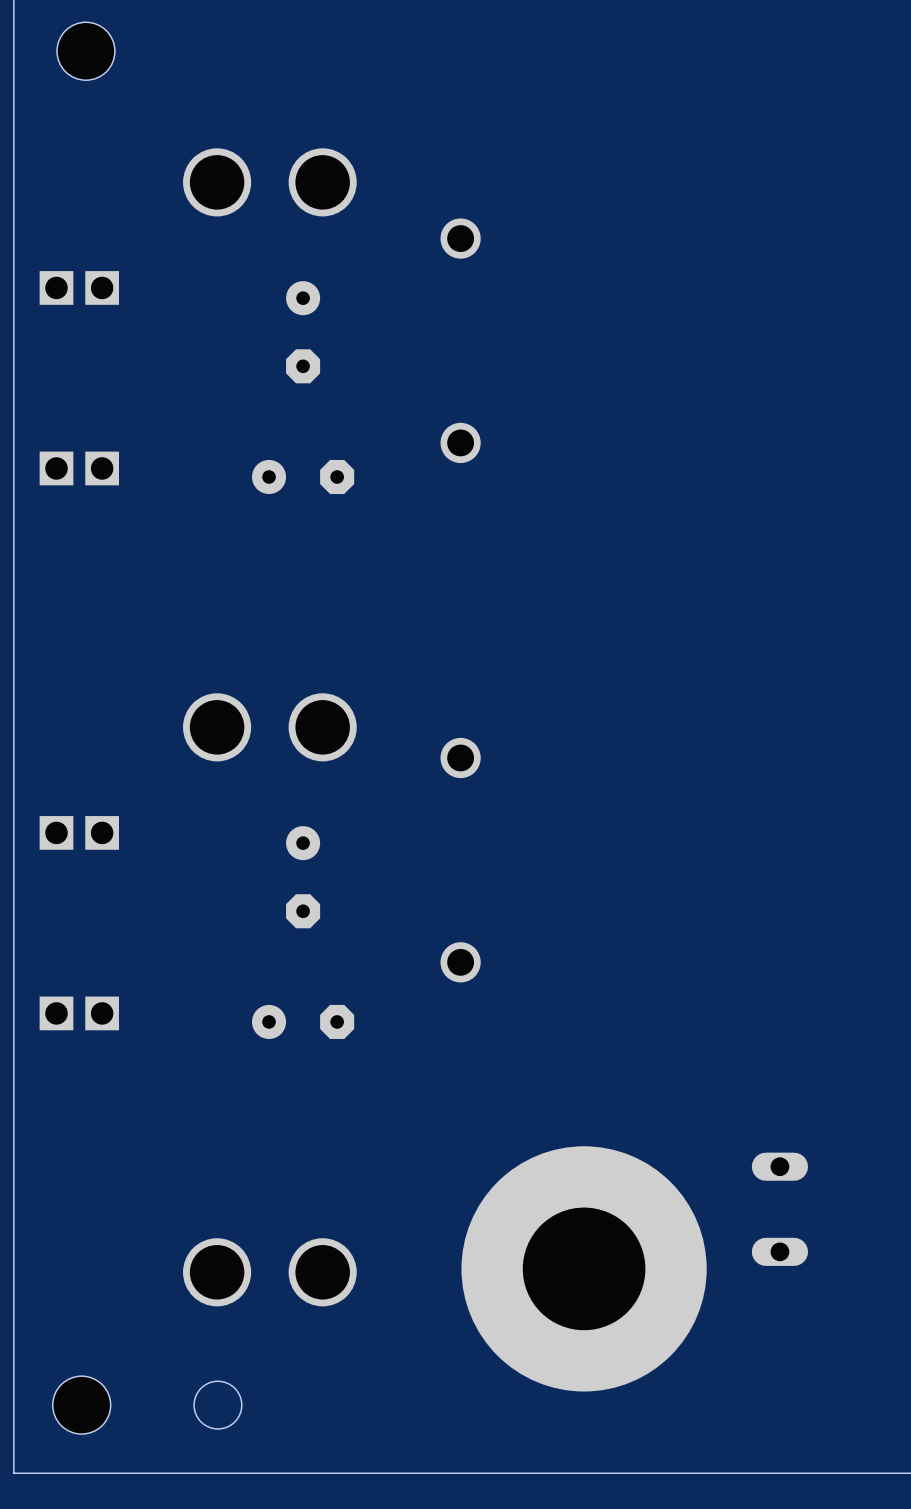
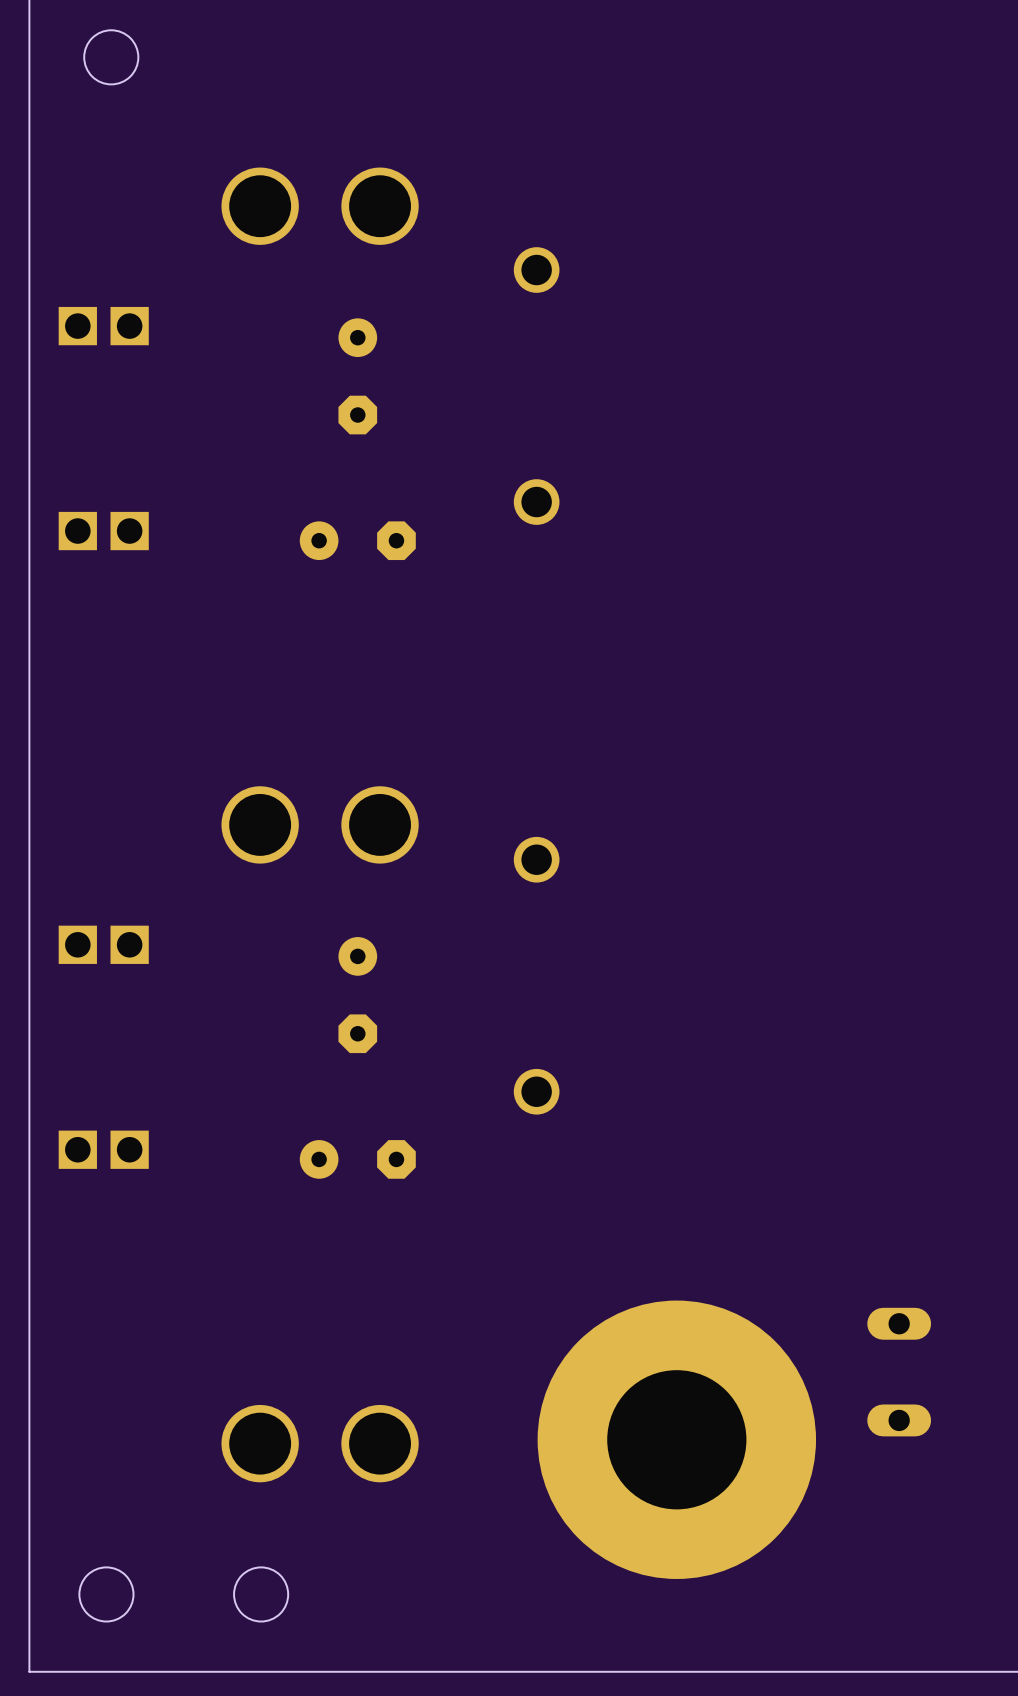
drawing: none -> [84, 30, 139, 85]
part: (85, 51) -> none
drawing: none -> [79, 1567, 134, 1622]
part: (81, 1405) -> none

